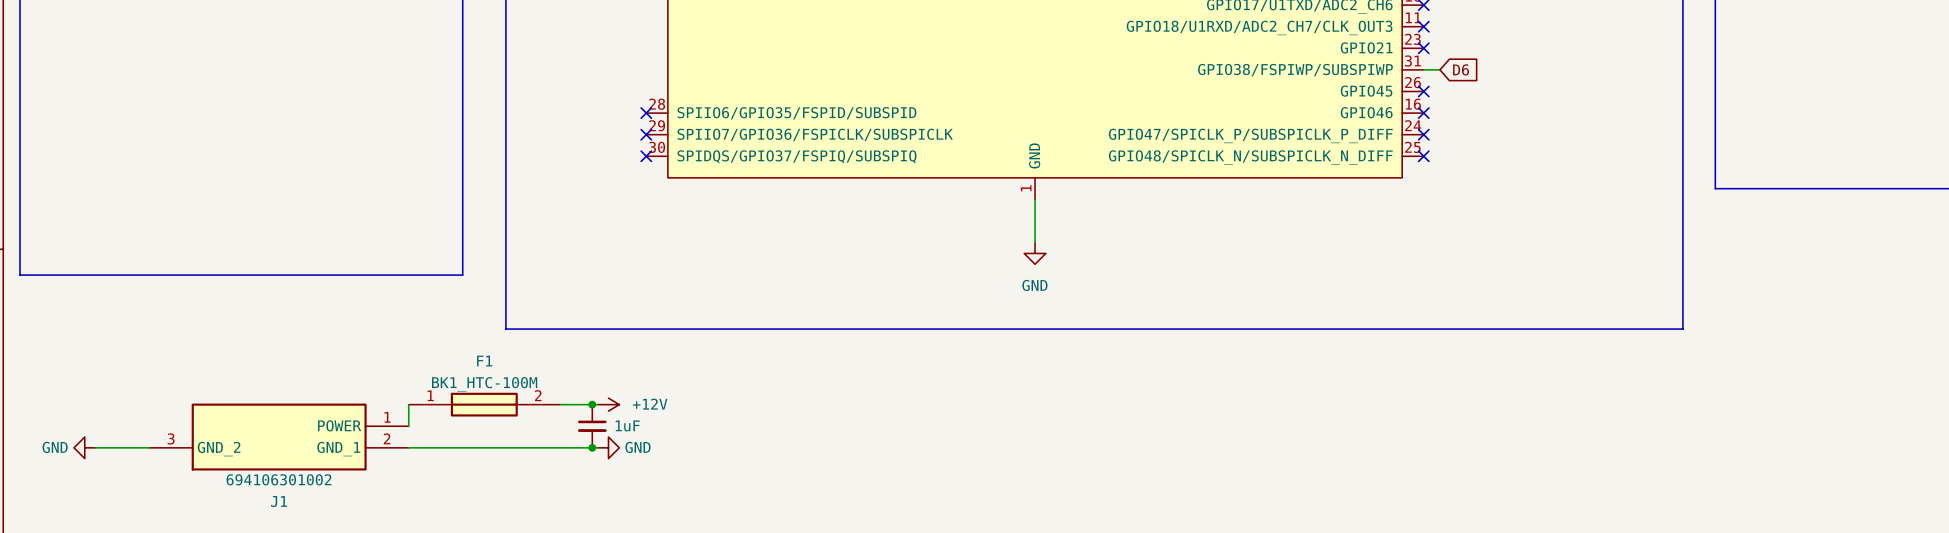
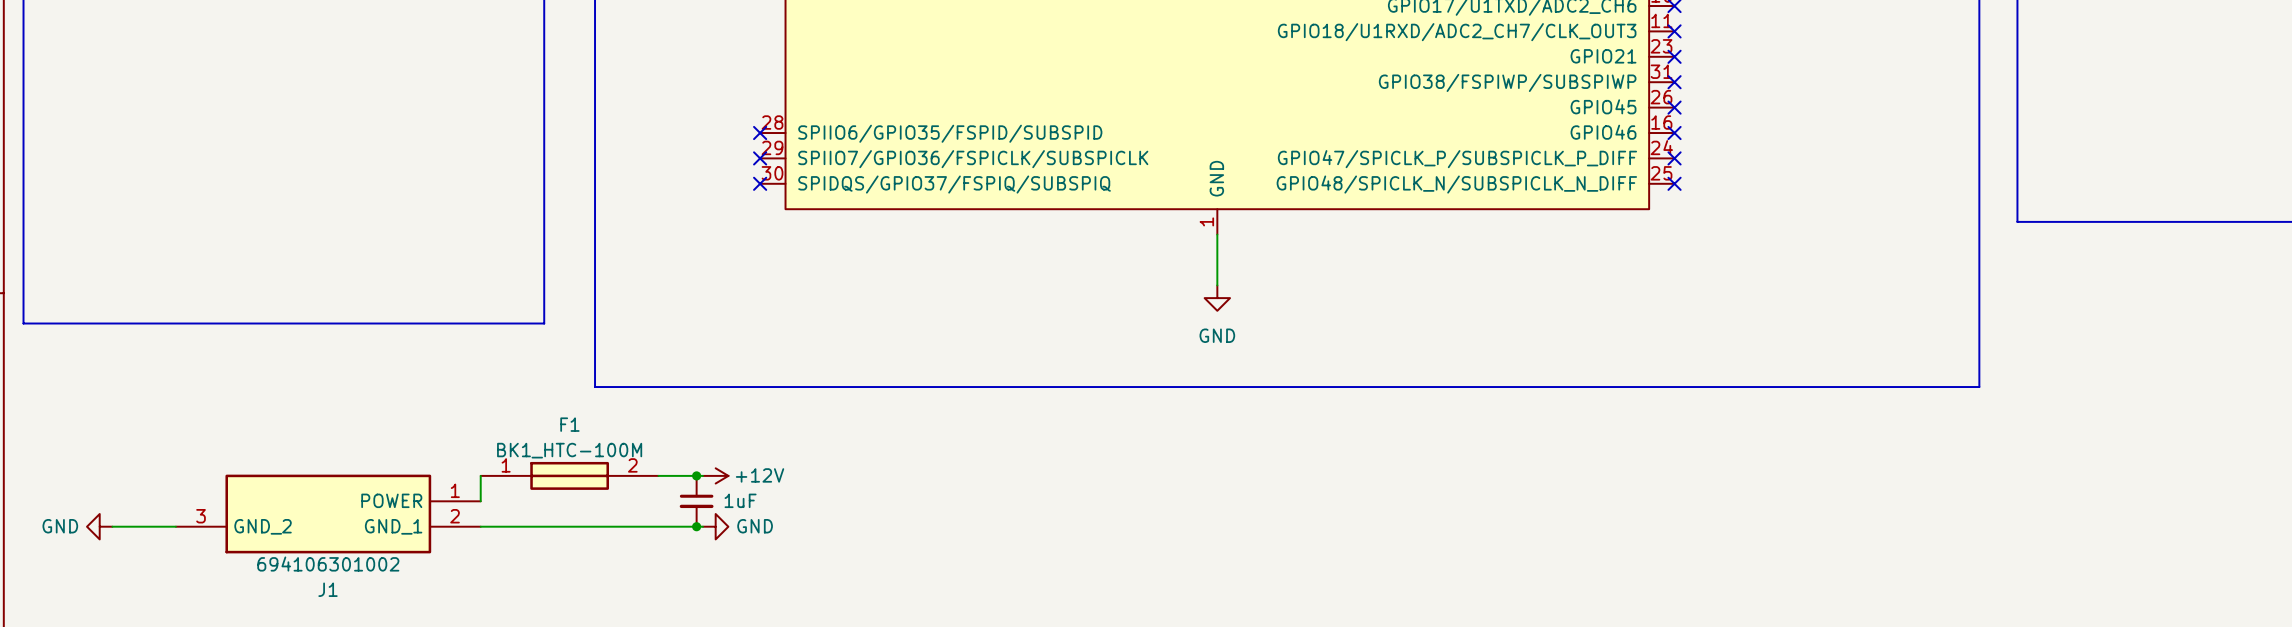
wire: (1423, 69) (1439, 69) -> none
no-connect mark: none -> (1674, 82)
global label: D6 (1461, 69) -> none

